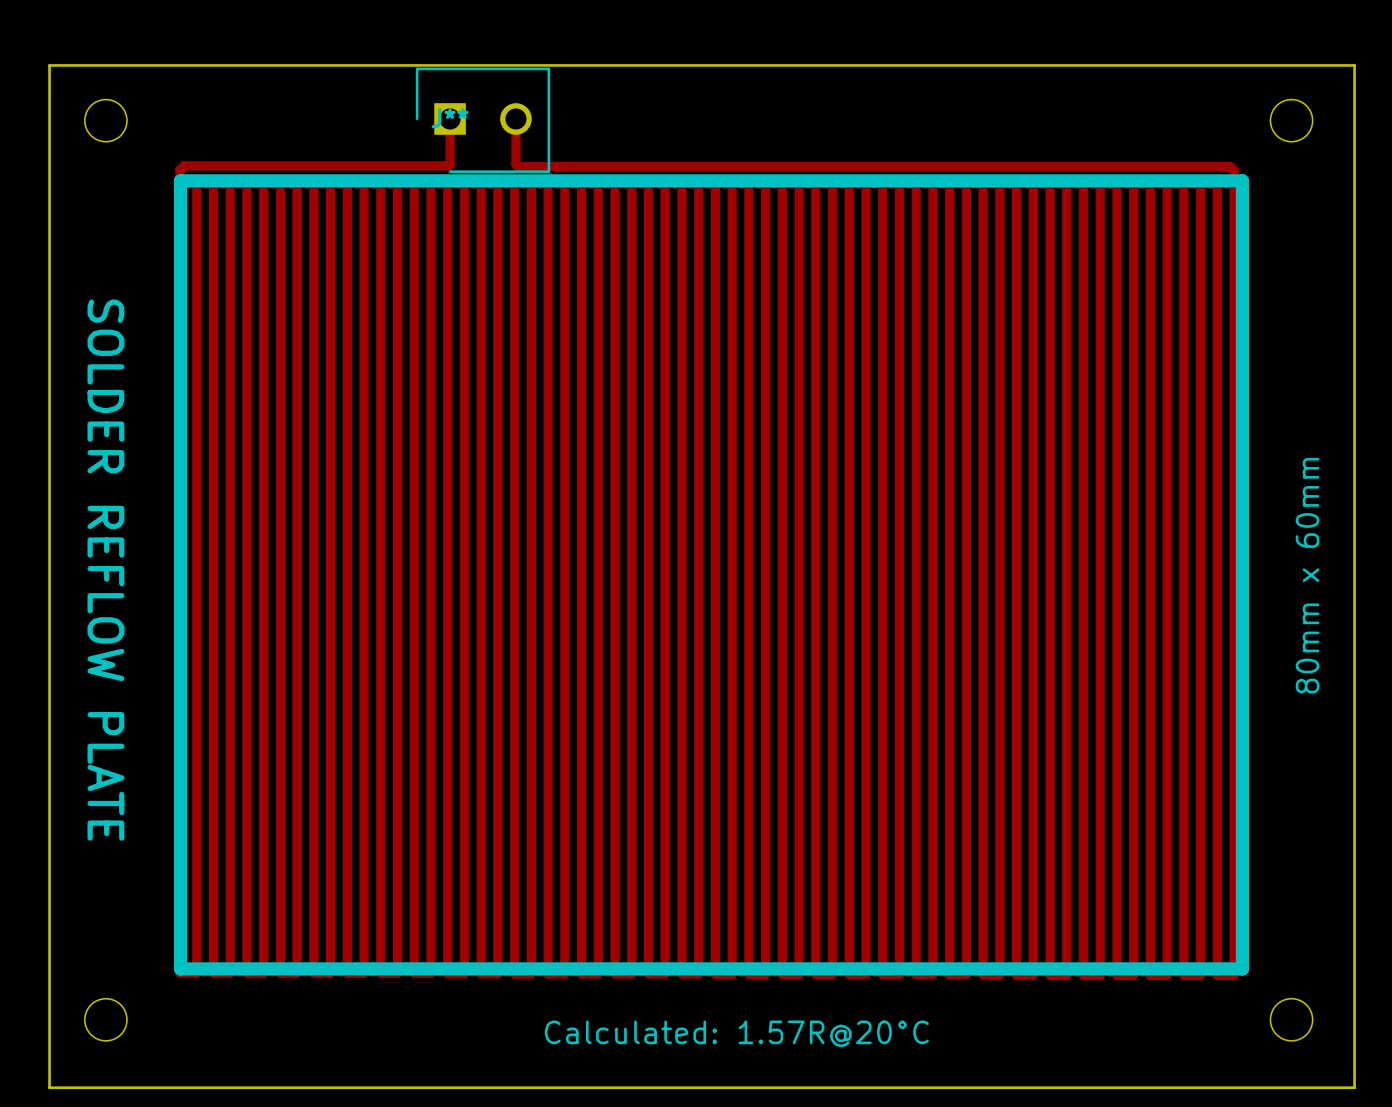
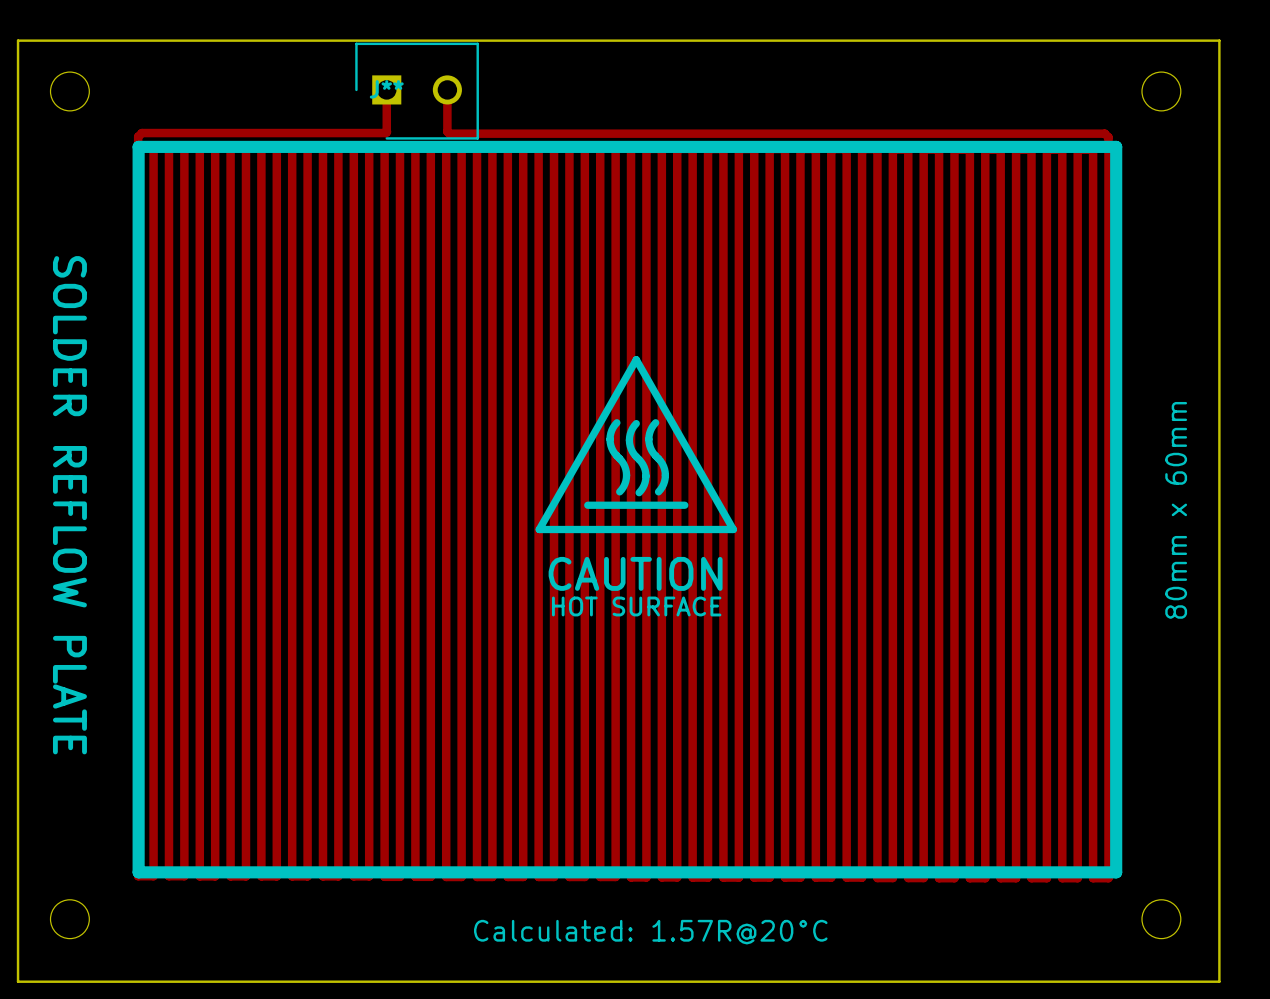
line: none -> (636, 359) (539, 529) (733, 529) (636, 359)
line: none -> (616, 422) (611, 430) (610, 439) (613, 451) (623, 463) (626, 472) (625, 481) (619, 491)
line: none -> (655, 422) (650, 430) (648, 439) (651, 451) (662, 463) (665, 472) (664, 481) (658, 491)
line: none -> (636, 423) (631, 431) (629, 440) (632, 451) (642, 464) (645, 473) (645, 482) (639, 492)
line: none -> (587, 505) (684, 505)
text: none -> CAUTION (635, 573)
text: none -> HOT SURFACE (636, 606)

